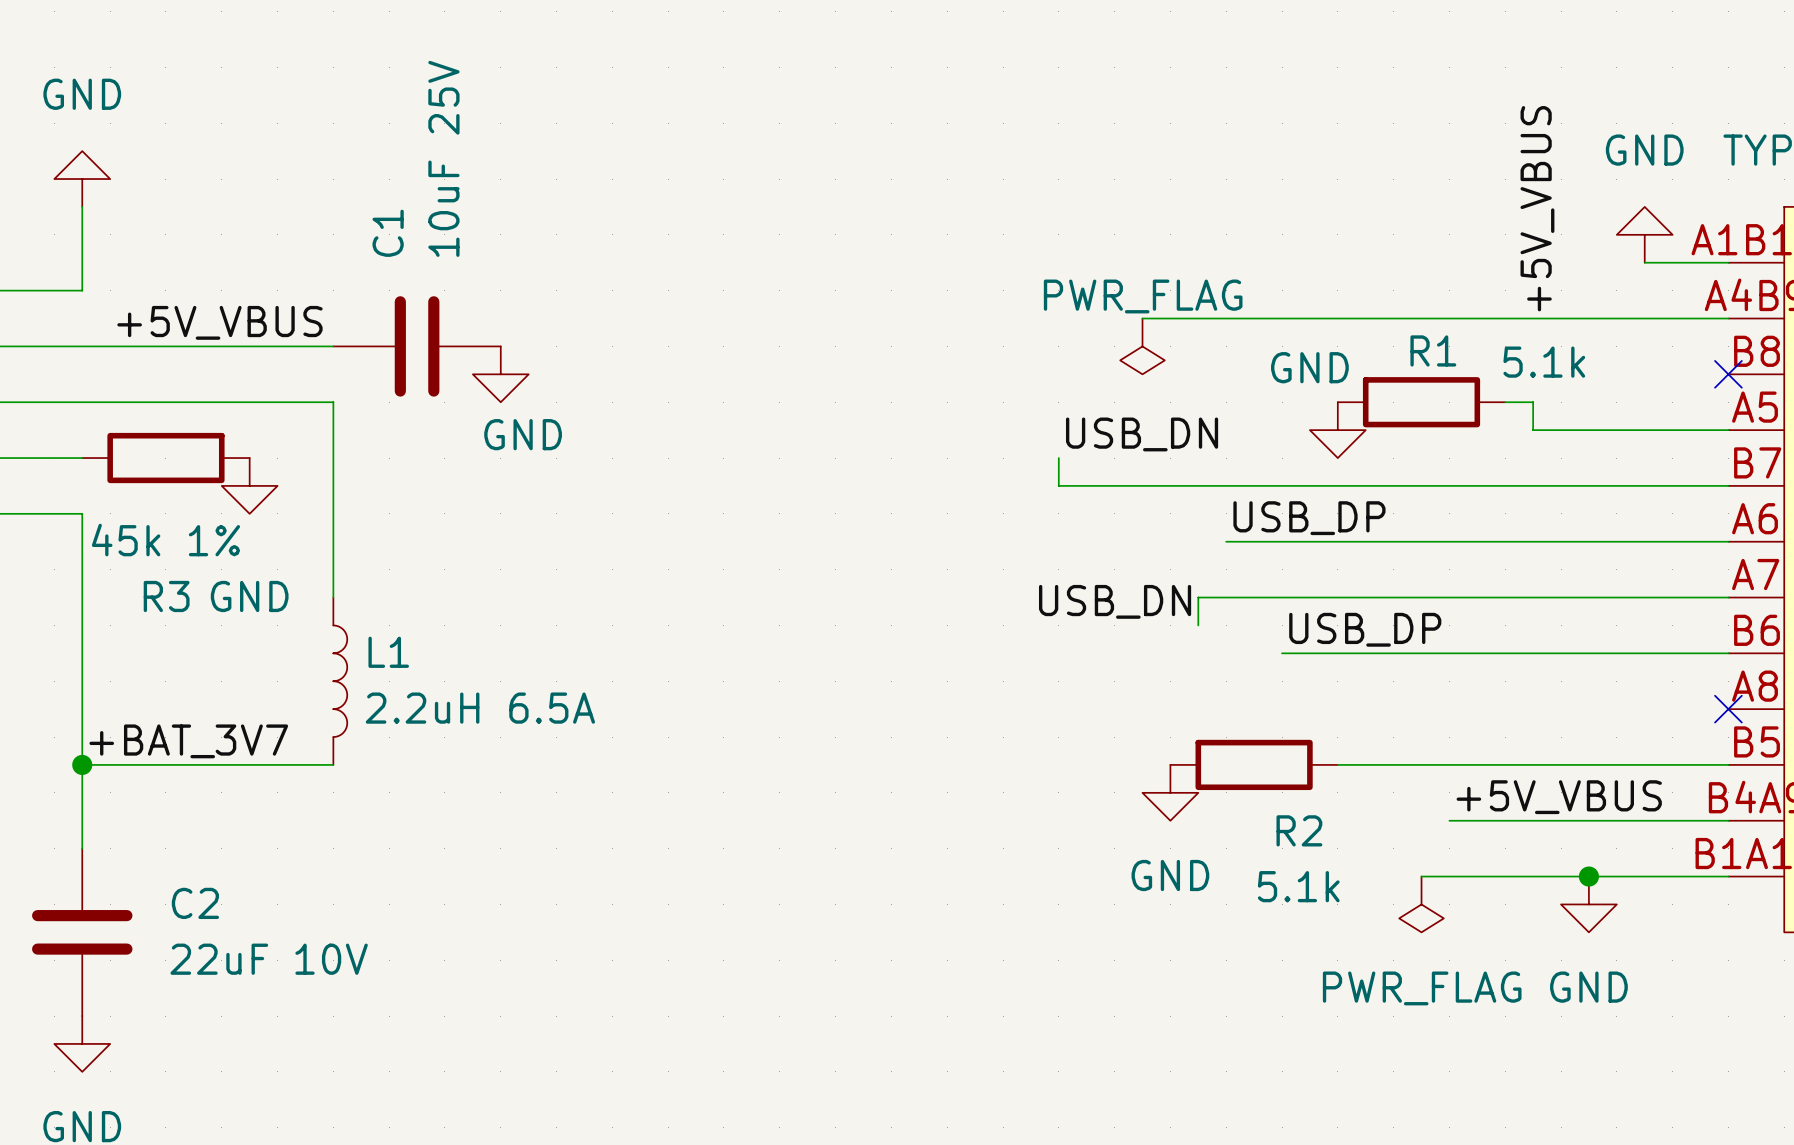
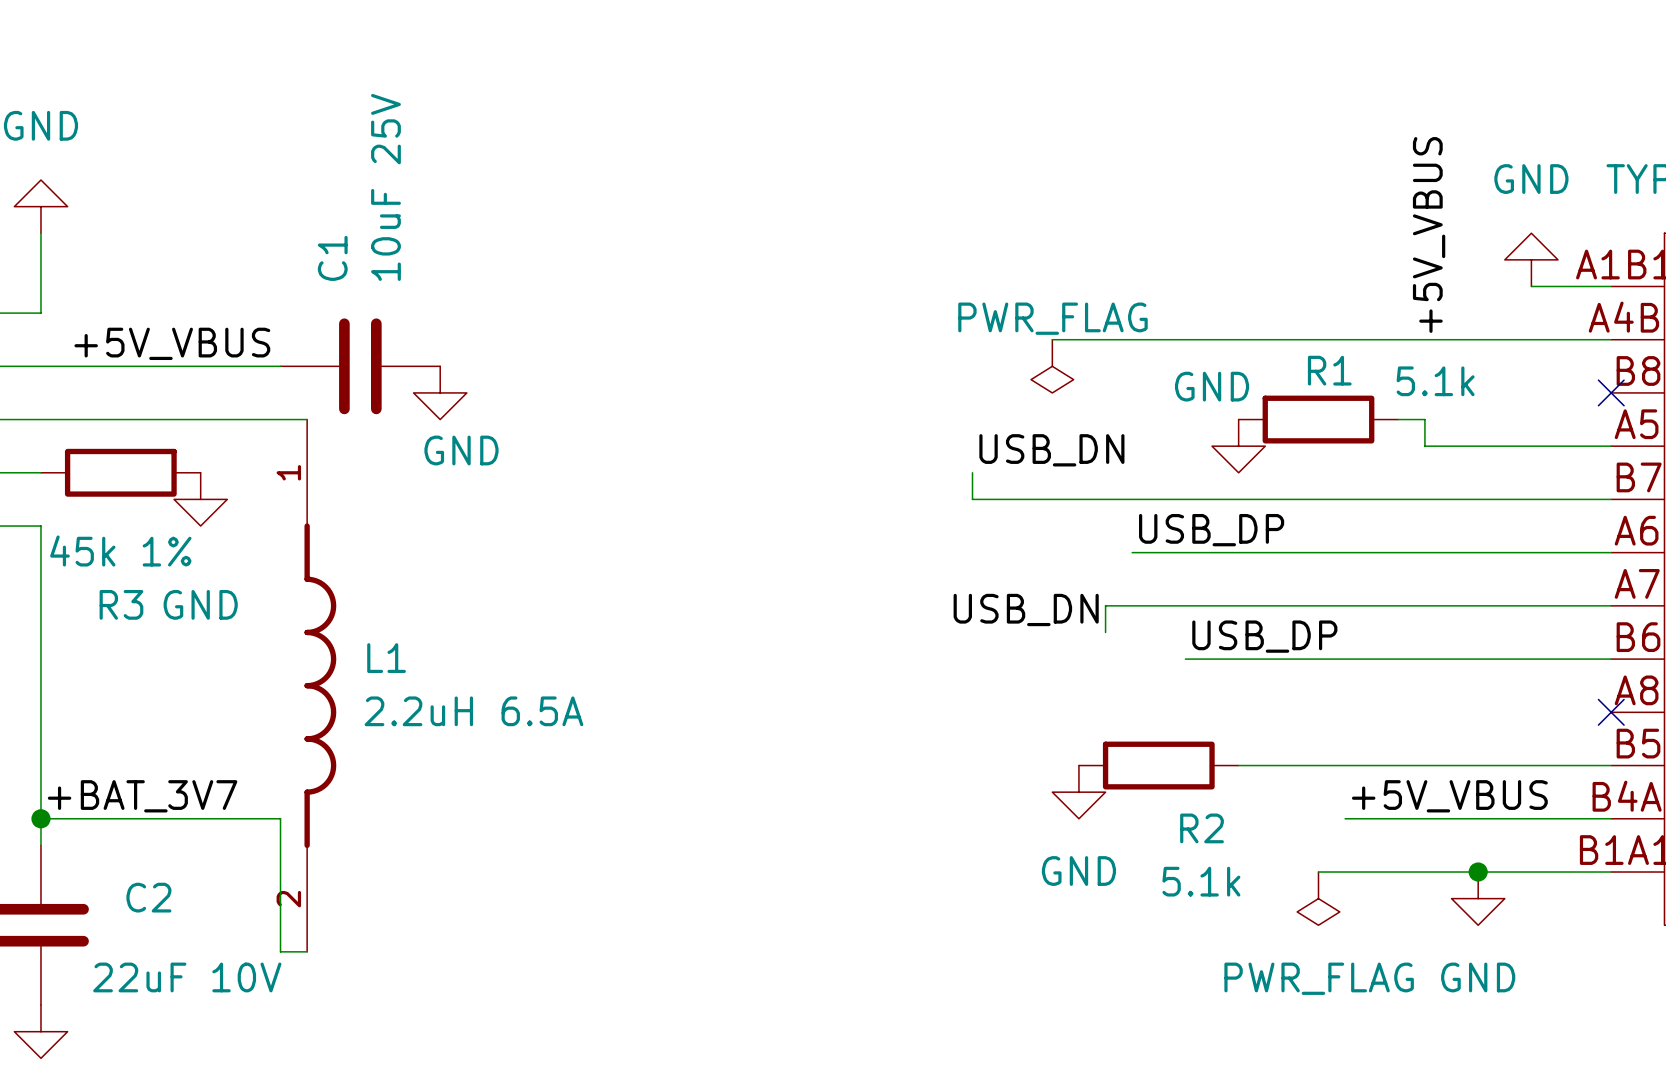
wire: (333, 402) (333, 597) -> (280, 419) (307, 419)
L1 symbol: [333, 597, 348, 765] -> [304, 419, 337, 952]
label position: +BAT_3V7 (188, 741) -> +BAT_3V7 (142, 796)
wire: (82, 764) (333, 764) -> none
junction position: (82, 764) -> (40, 818)
wire: none -> (40, 818) (280, 818) (280, 951) (307, 951)
C2 value position: 22uF 10V (269, 959) -> 22uF 10V (187, 977)

